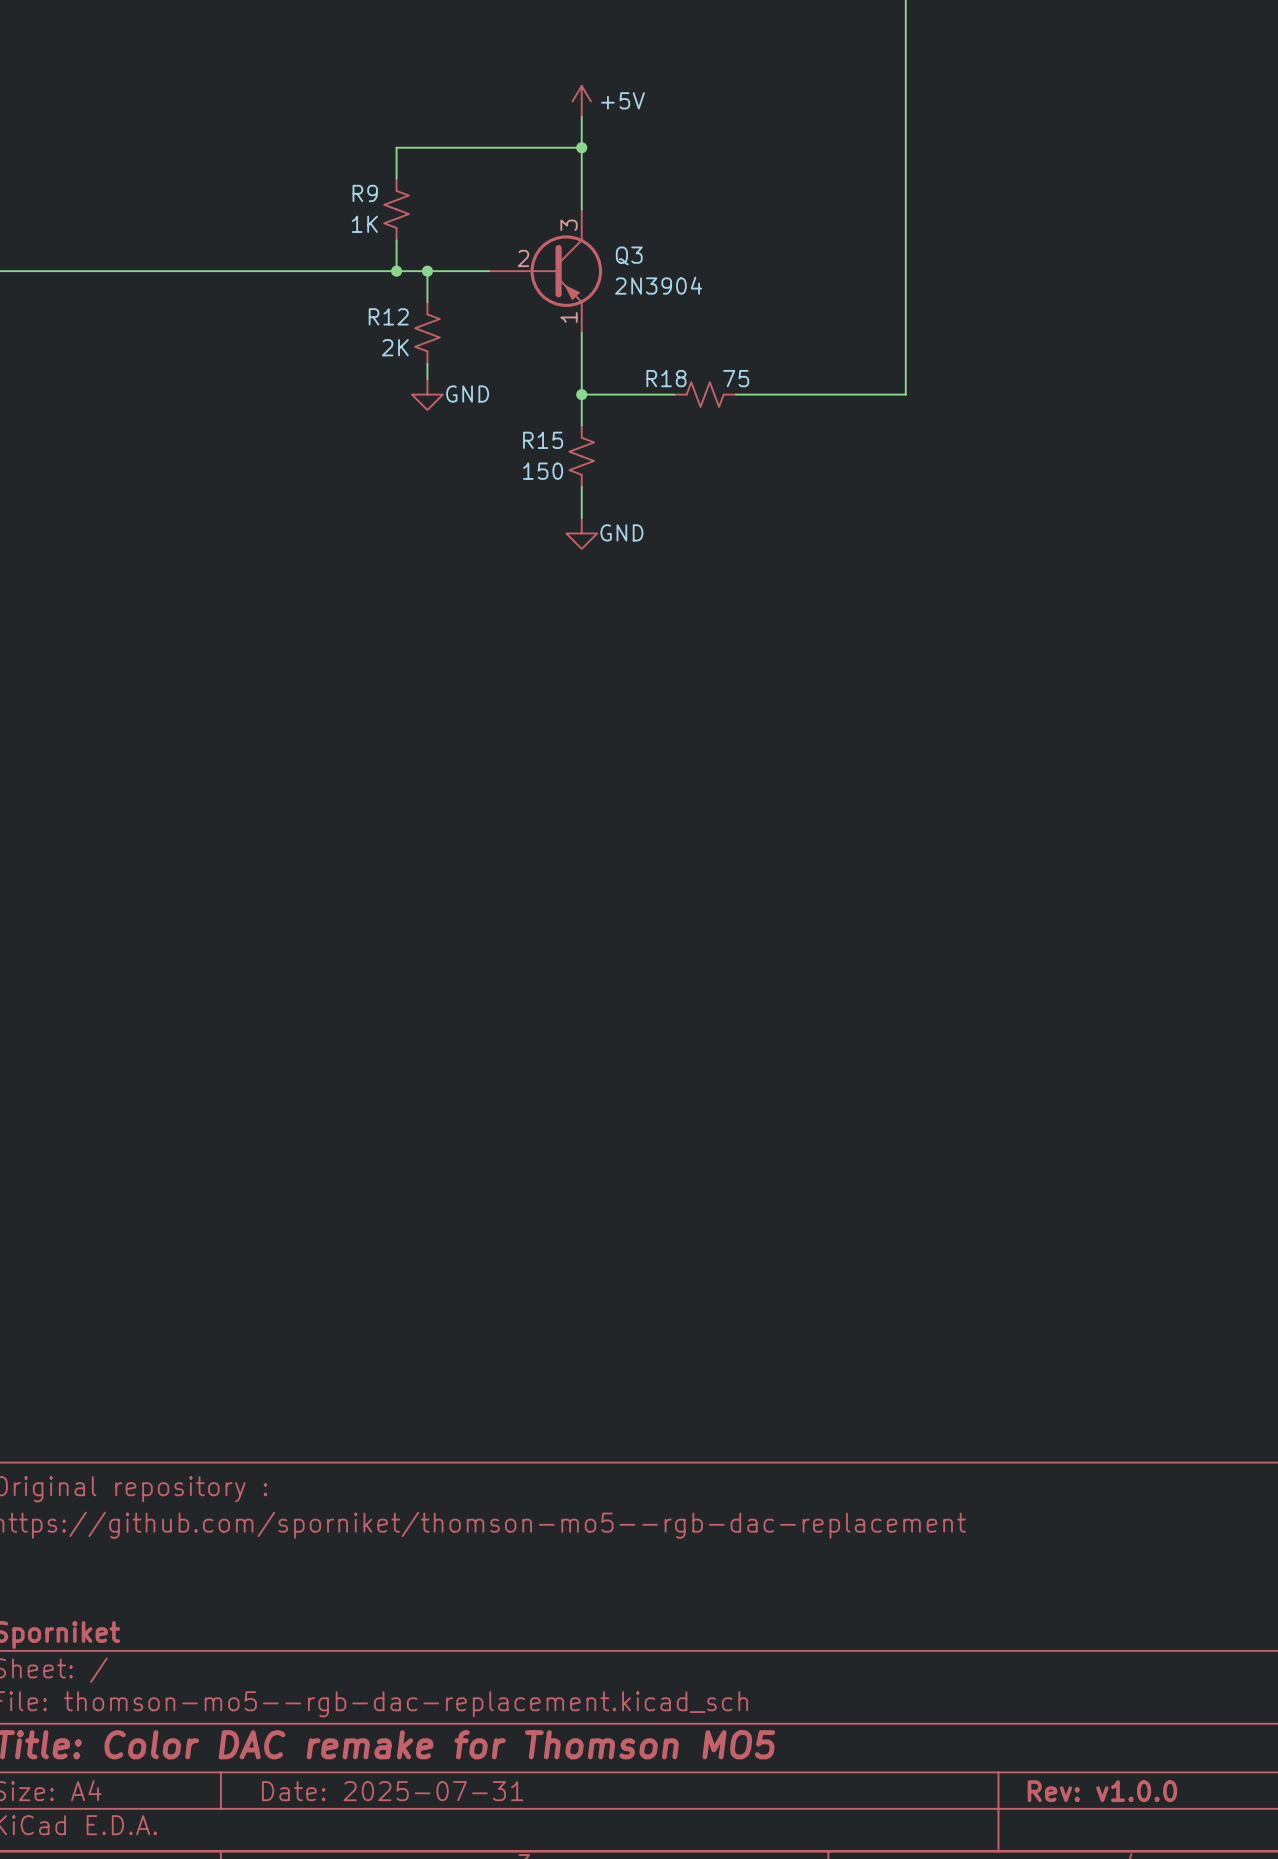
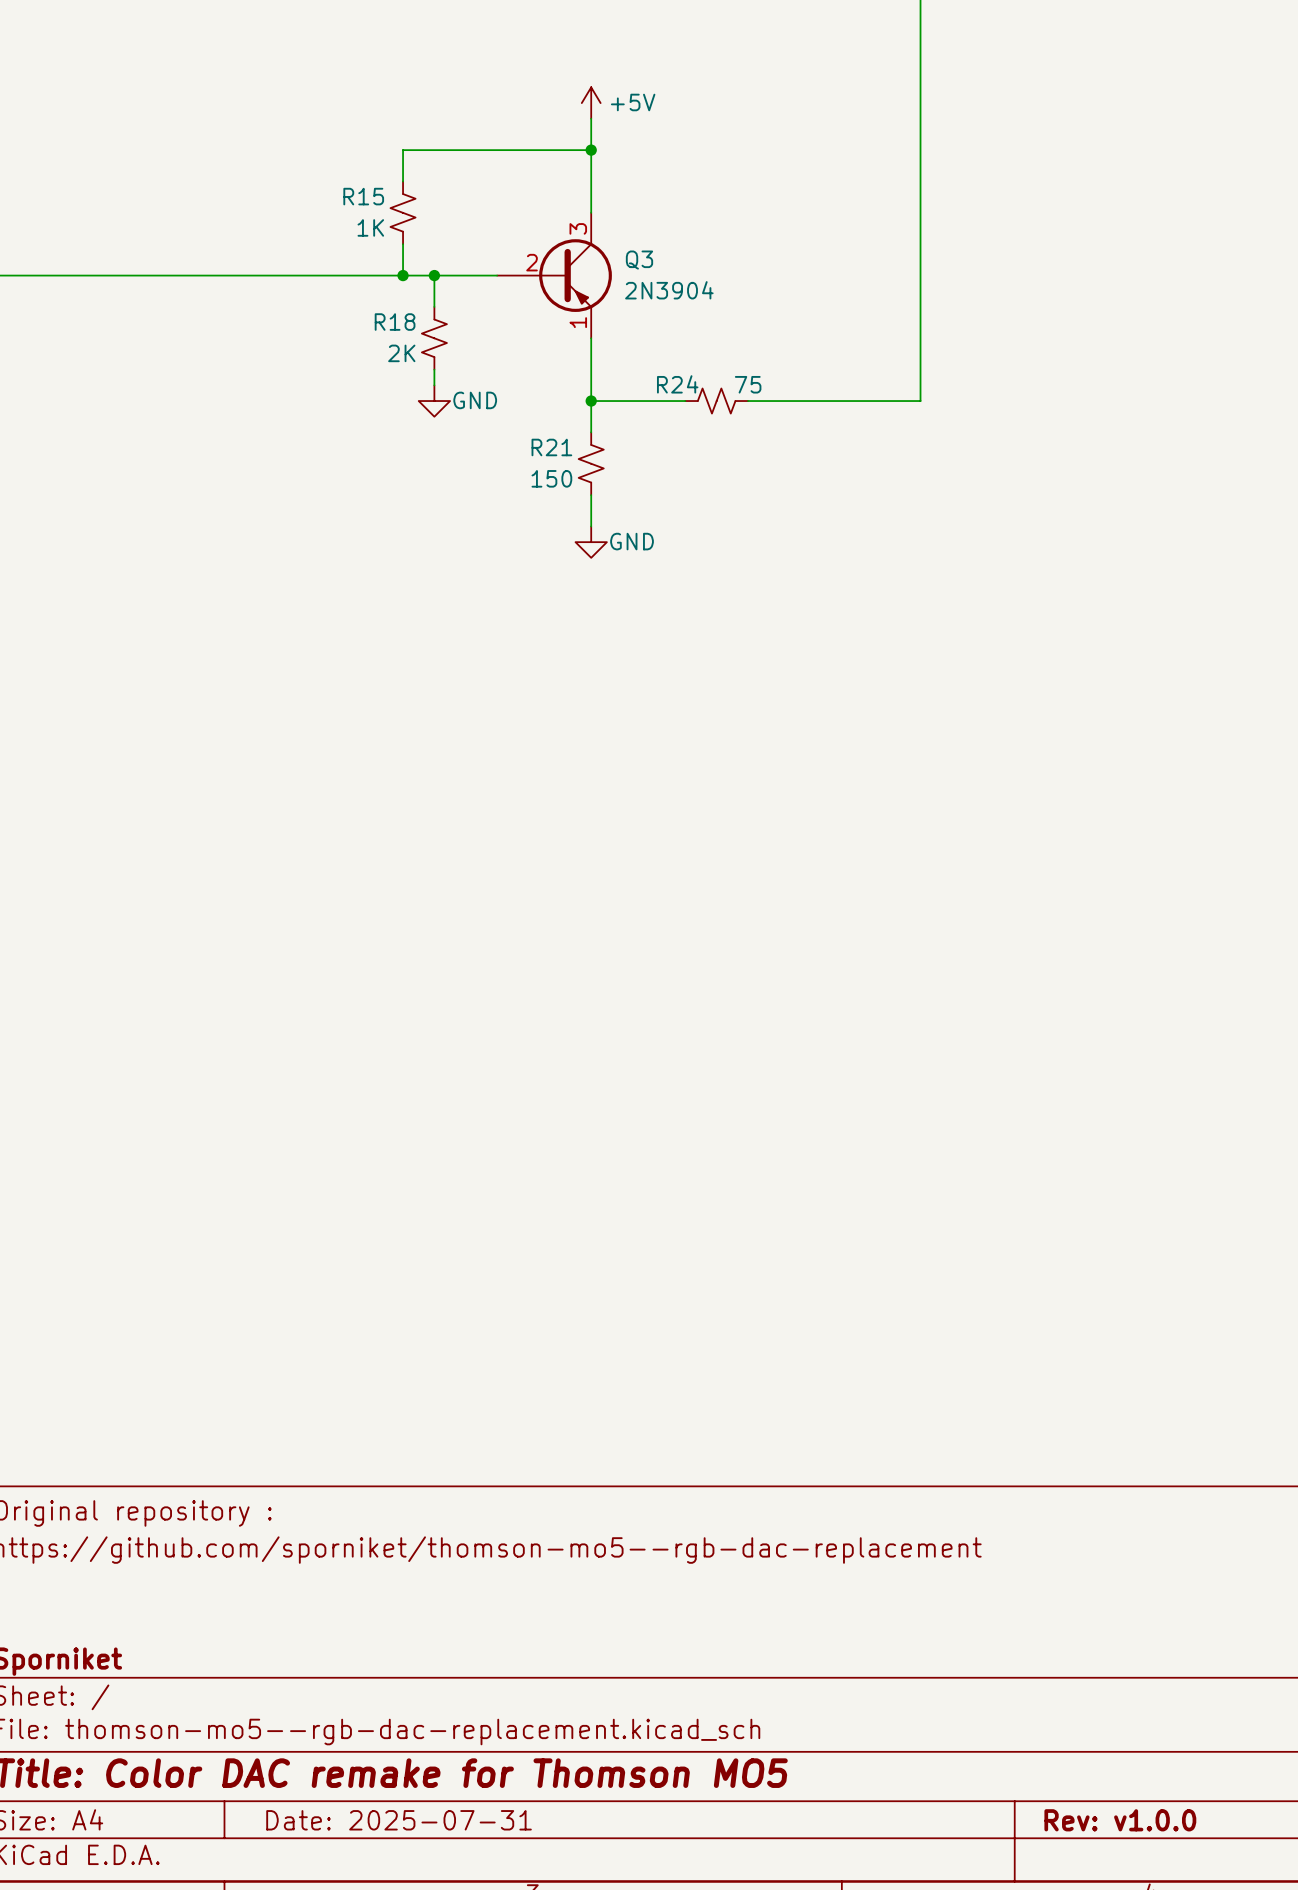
R9 name: R9 (365, 193) -> R15 (363, 196)
R12 name: R12 (388, 316) -> R18 (395, 322)
R18 name: R18 (666, 378) -> R24 (677, 384)
R15 name: R15 (543, 440) -> R21 (551, 447)

